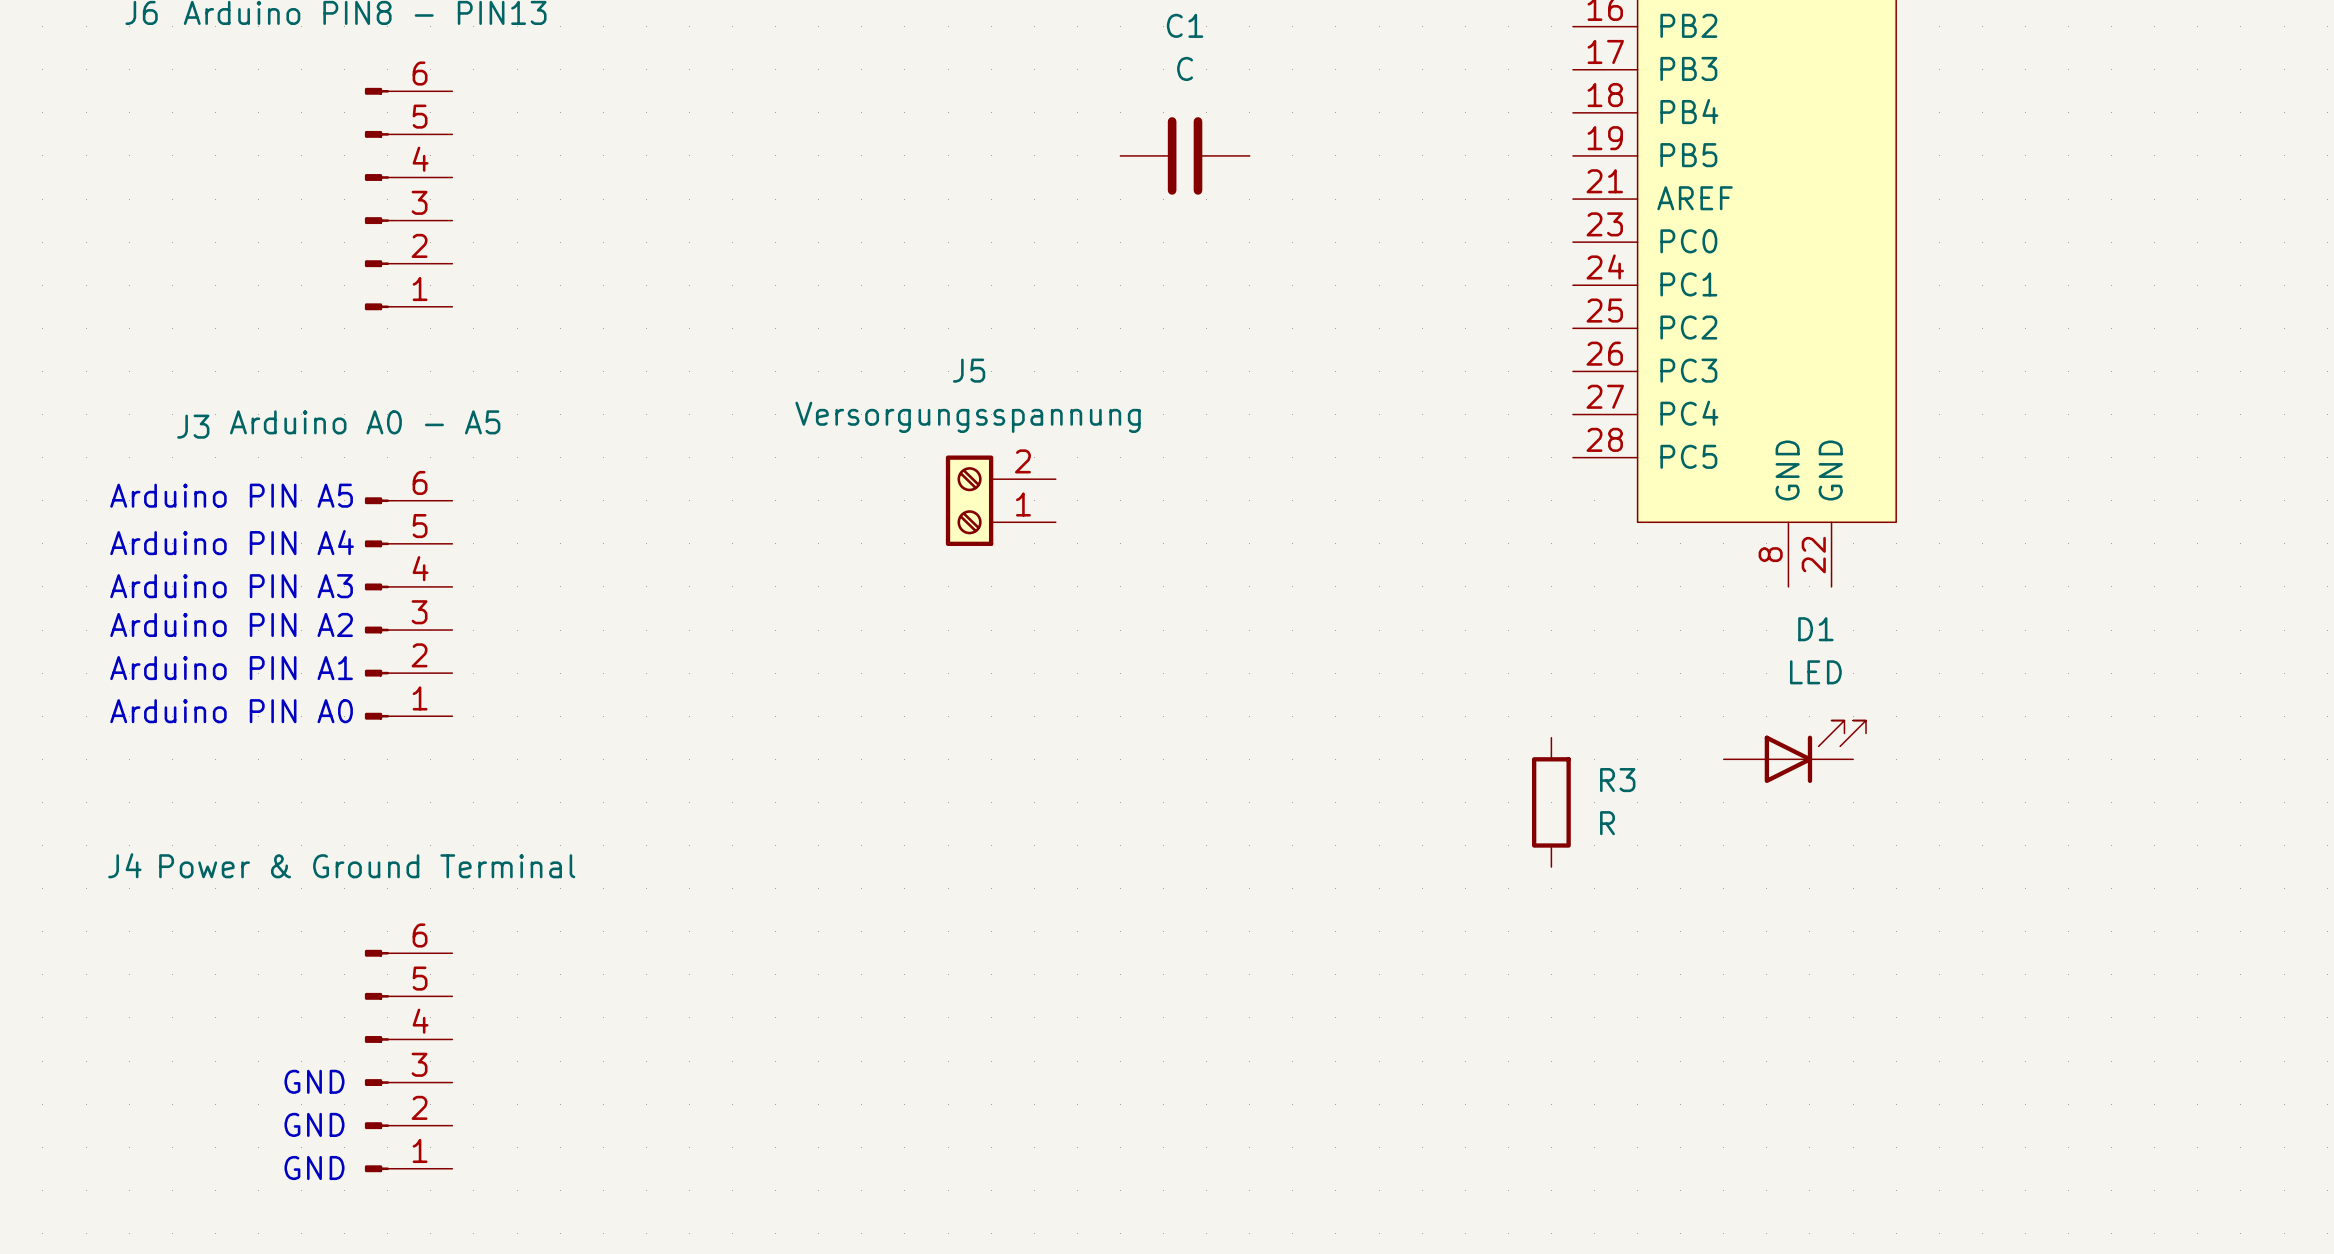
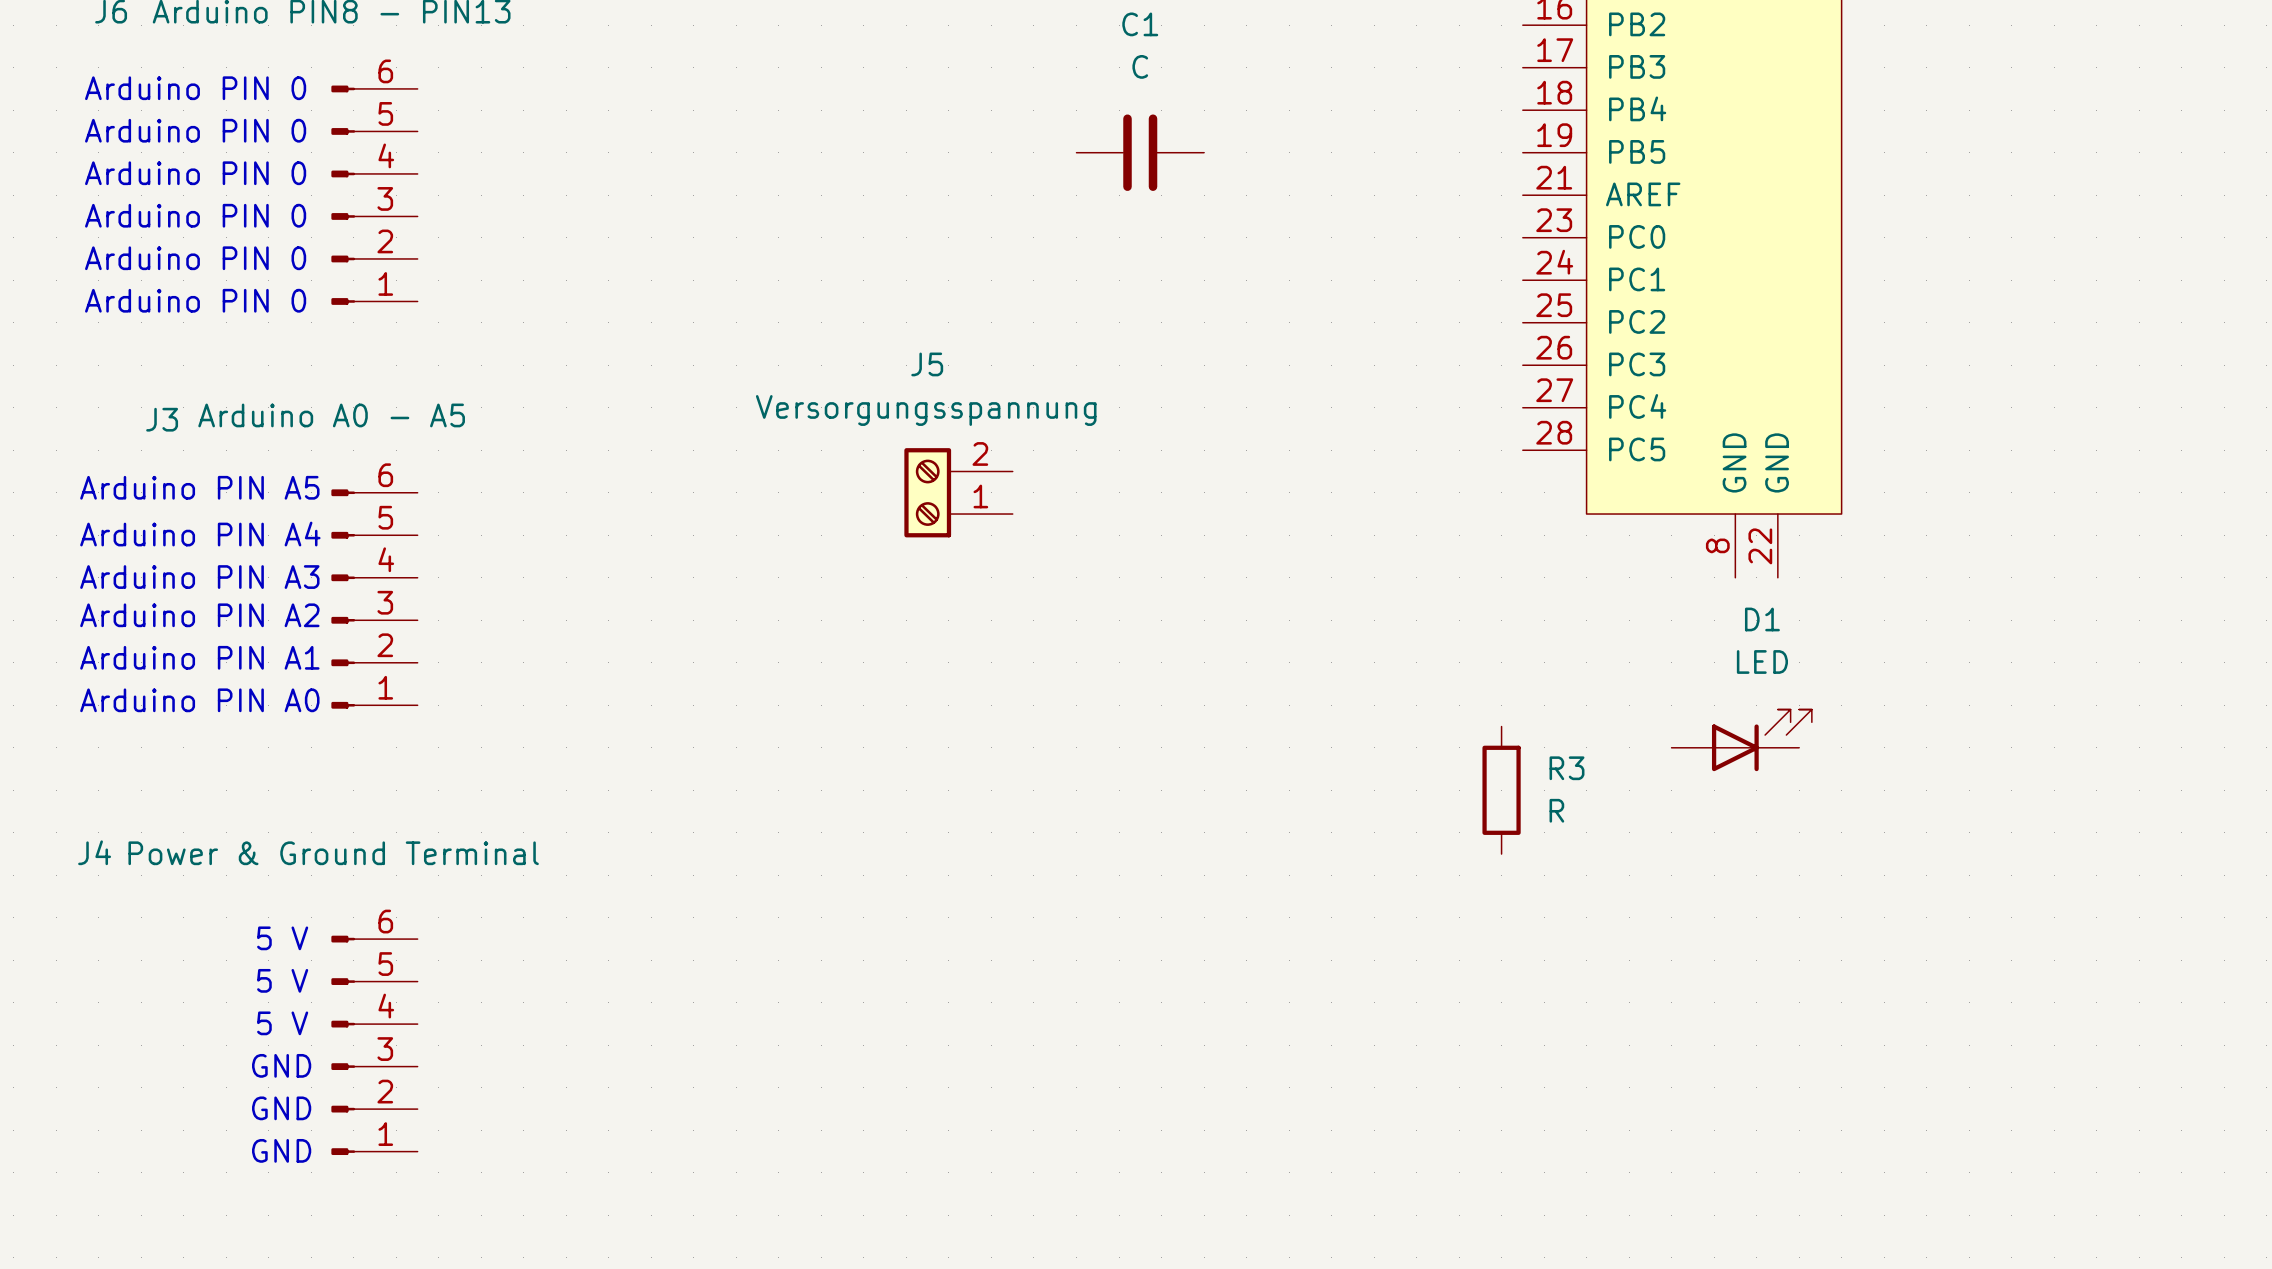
text: none -> Arduino PIN 0 (195, 88)
text: none -> Arduino PIN 0 (195, 130)
text: none -> Arduino PIN 0 (195, 173)
text: none -> Arduino PIN 0 (195, 215)
text: none -> Arduino PIN 0 (195, 258)
text: none -> Arduino PIN 0 (195, 300)
text: none -> 5 V (282, 938)
text: none -> 5 V (282, 980)
text: none -> 5 V (282, 1023)

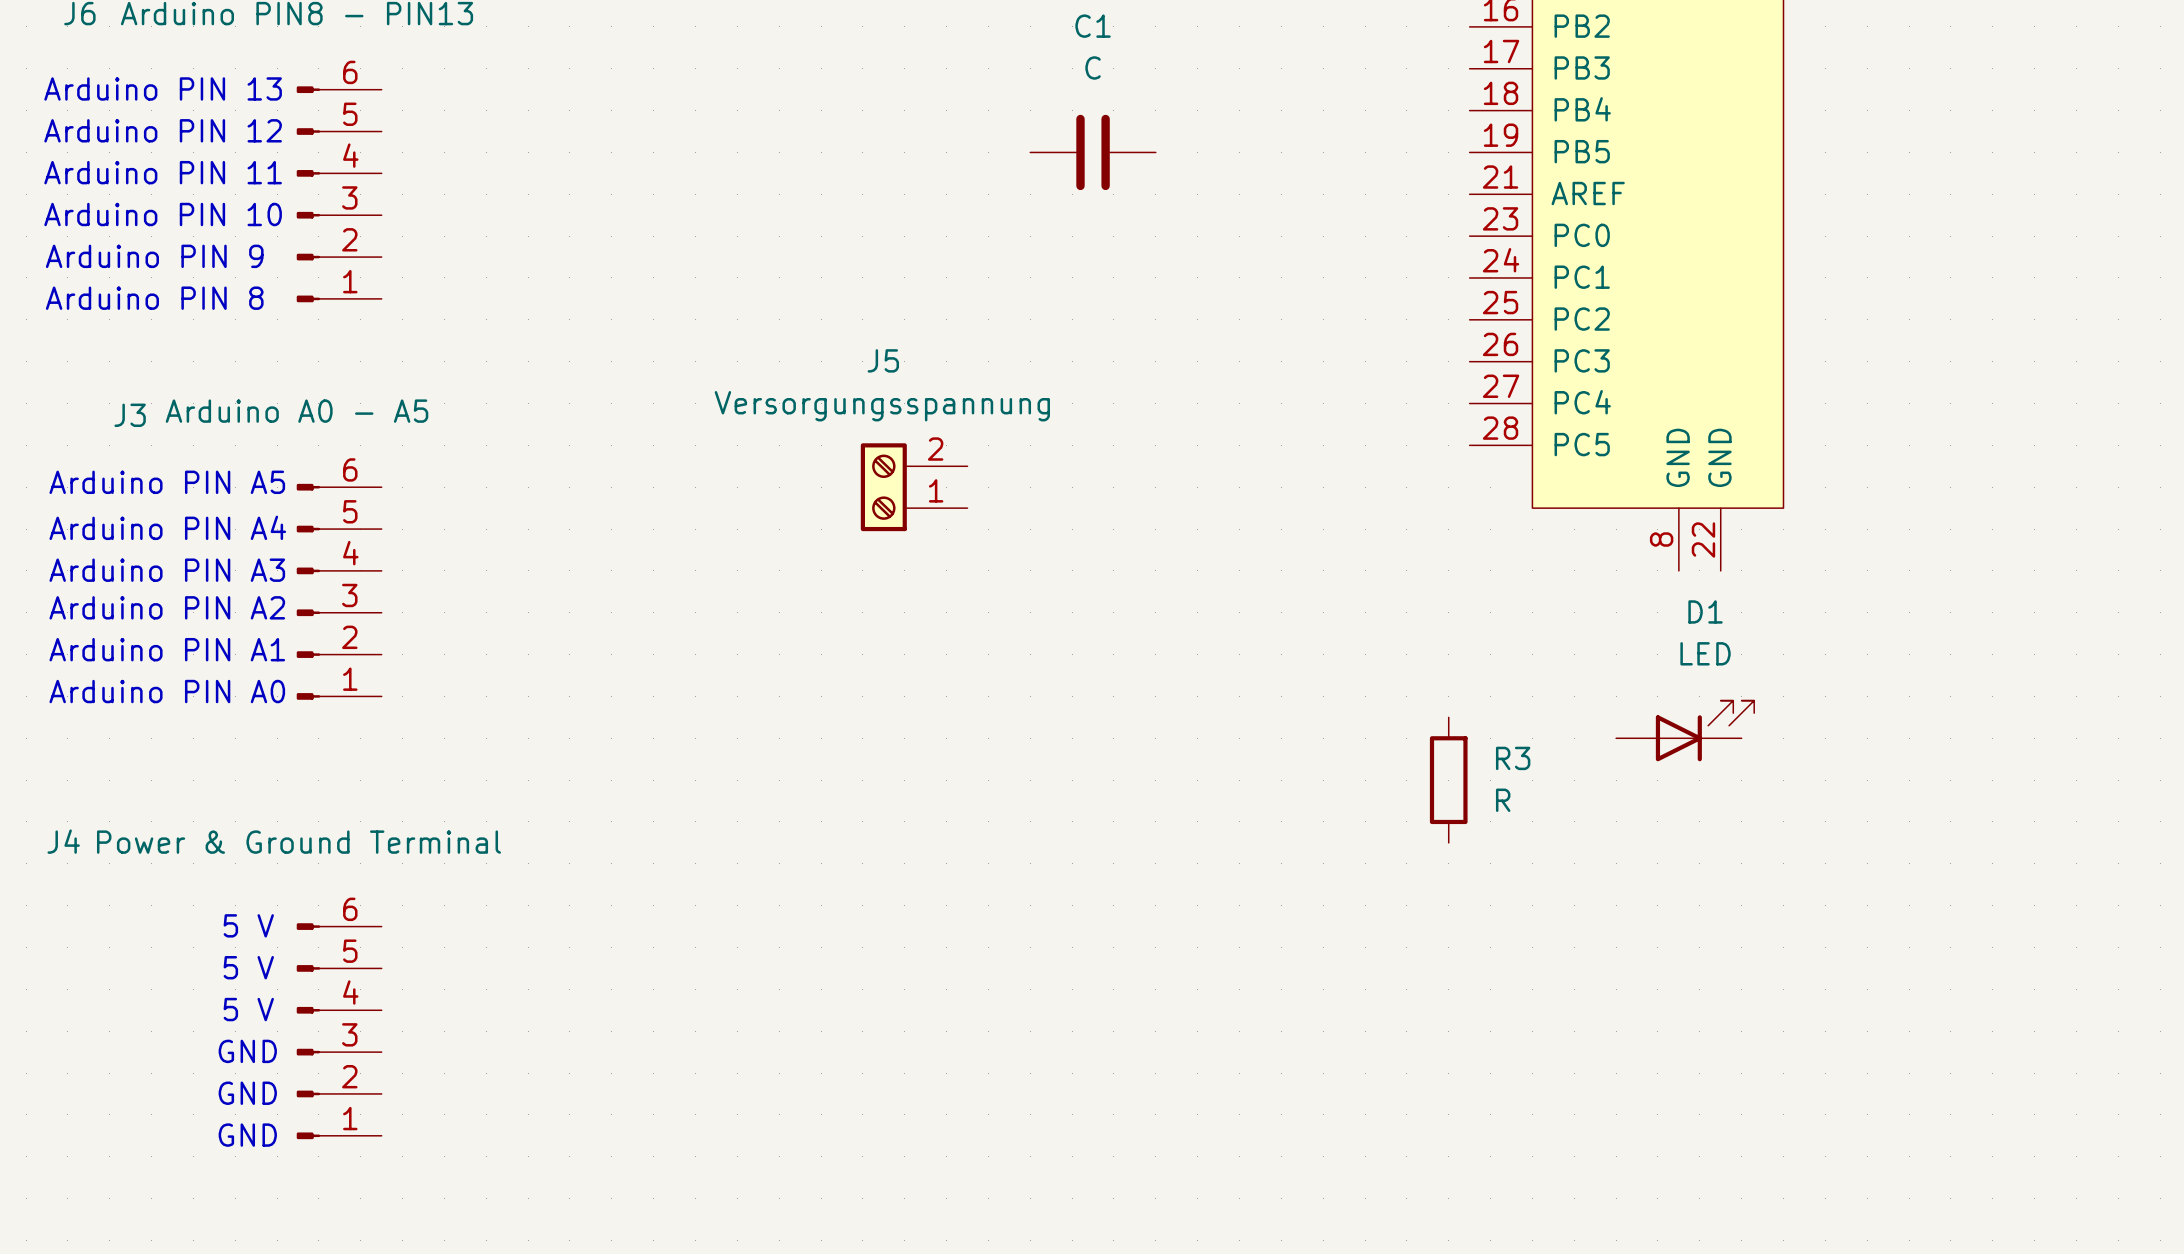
text: Arduino PIN 0 (195, 88) -> Arduino PIN 13 (163, 88)
text: Arduino PIN 0 (195, 130) -> Arduino PIN 12 (163, 130)
text: Arduino PIN 0 (195, 173) -> Arduino PIN 11 (163, 172)
text: Arduino PIN 0 (195, 215) -> Arduino PIN 10 (163, 214)
text: Arduino PIN 0 (195, 258) -> Arduino PIN 9 (154, 256)
text: Arduino PIN 0 (195, 300) -> Arduino PIN 8 (154, 298)

